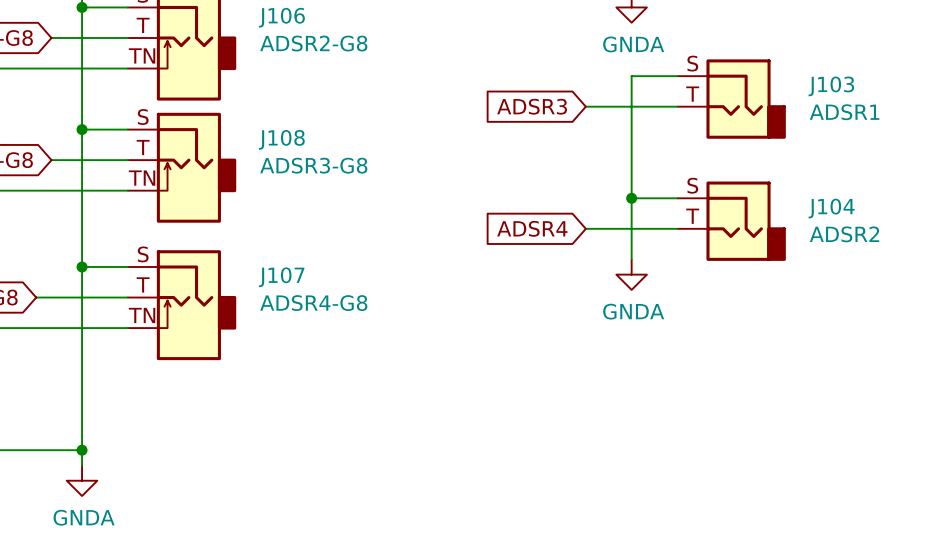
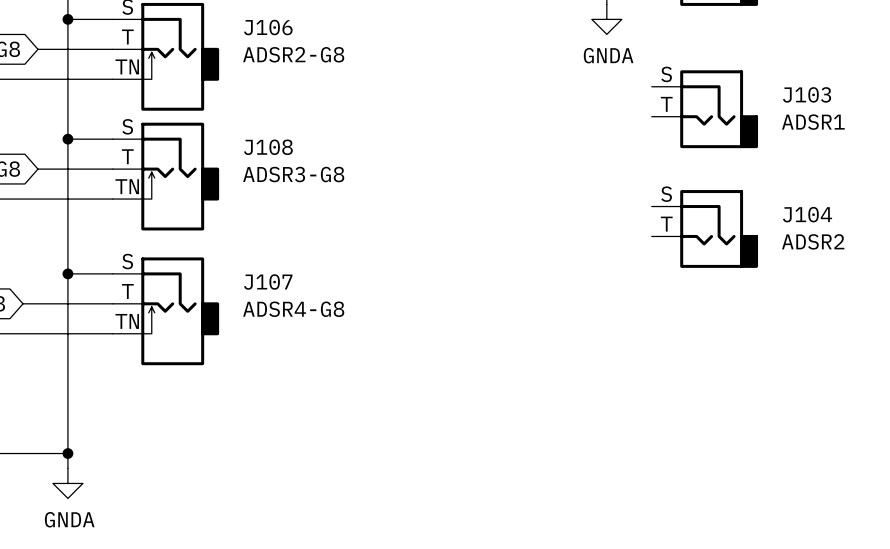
wire: (677, 76) (631, 76) (631, 259) -> none
global label: ADSR3 (532, 106) -> none
wire: (585, 106) (677, 106) -> none
wire: (631, 198) (677, 198) -> none
junction: (631, 198) -> none
global label: ADSR4 (532, 228) -> none
wire: (585, 228) (677, 228) -> none
power symbol: GNDA (631, 274) -> none

